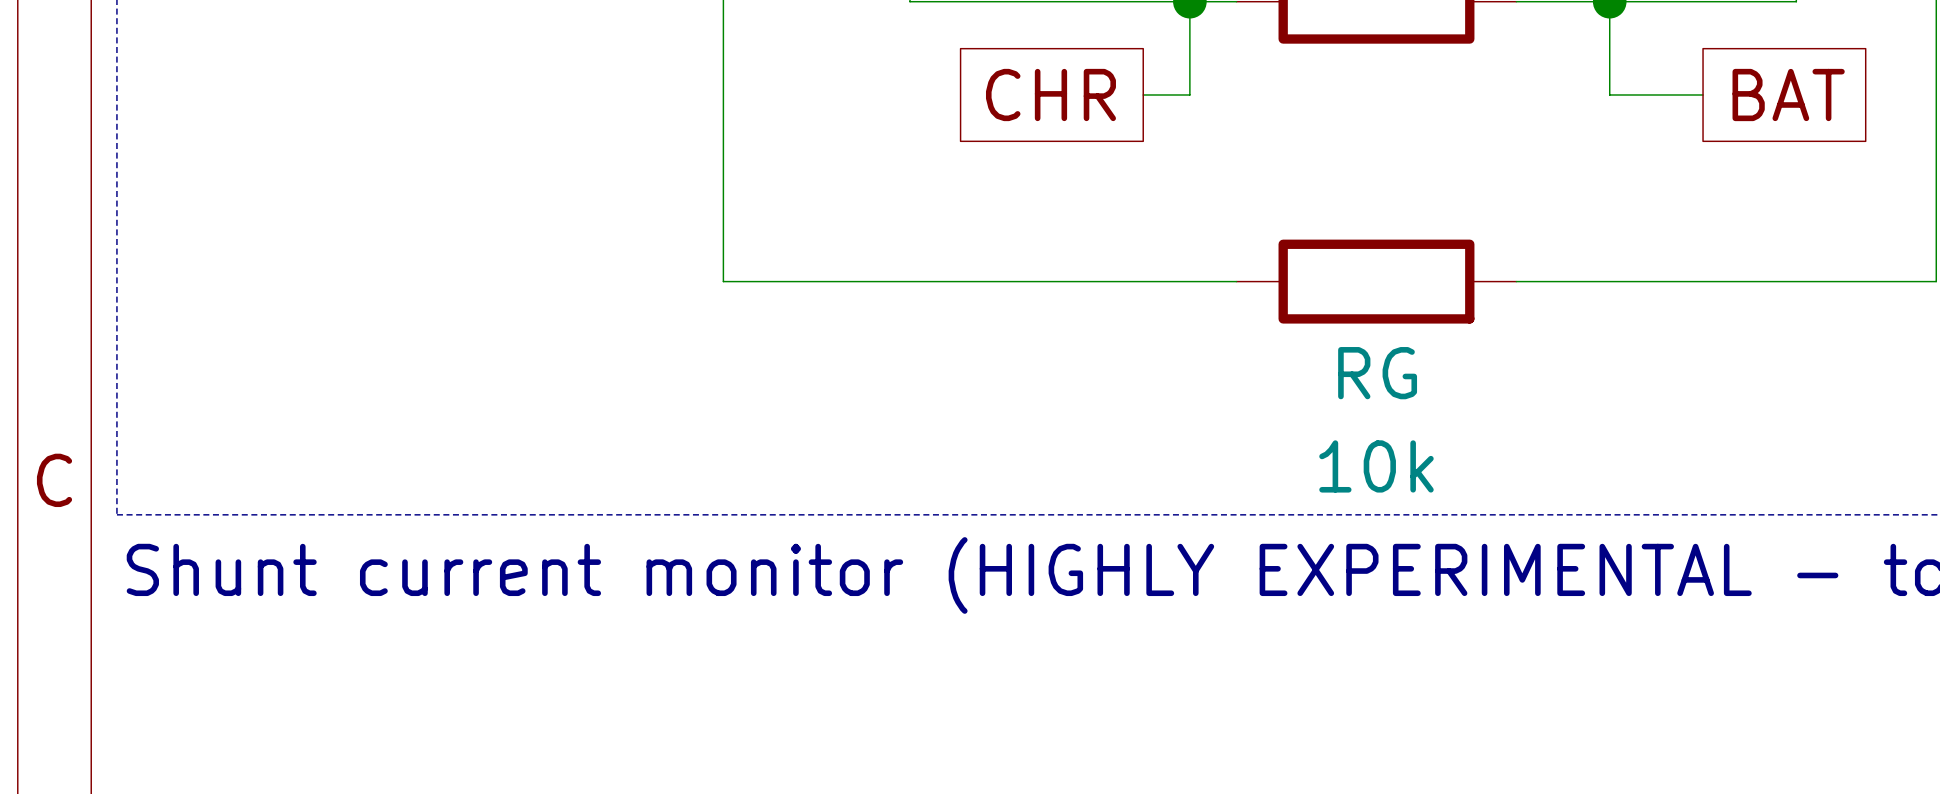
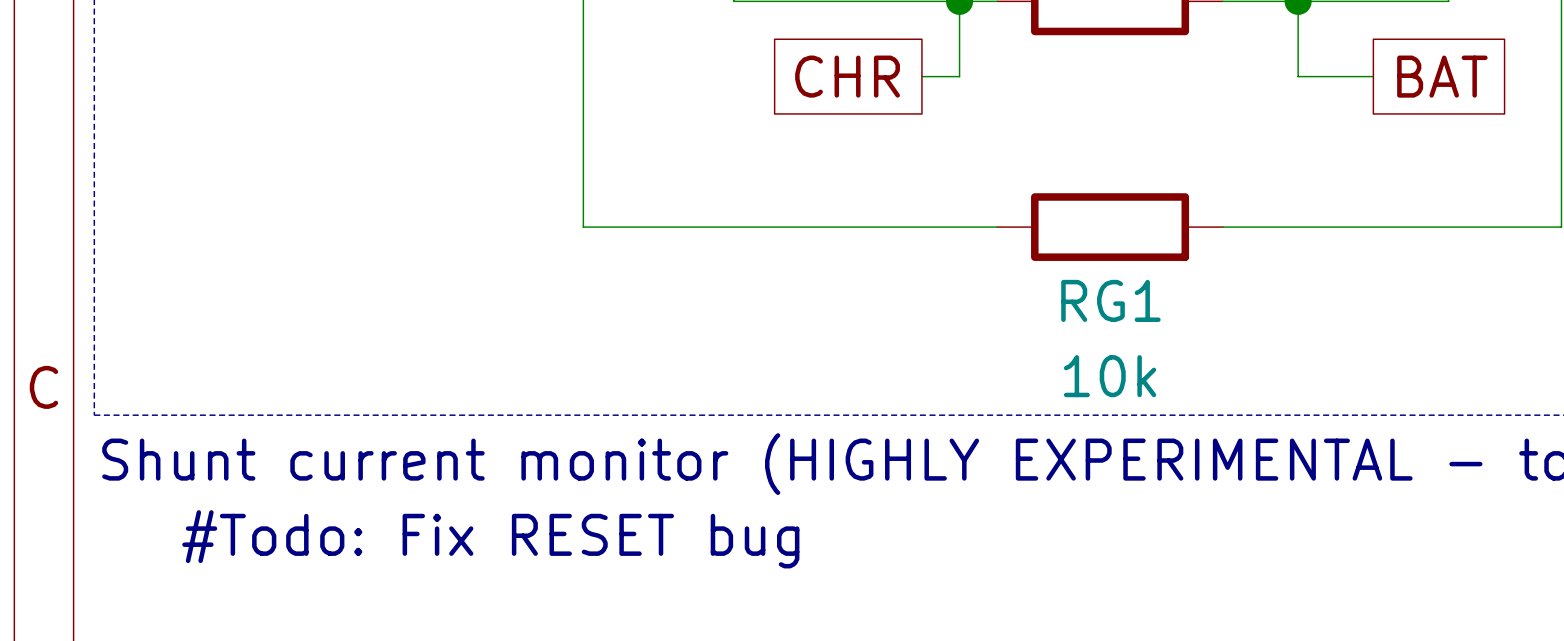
RG name: RG (1377, 373) -> RG1 (1110, 300)
text: none -> #Todo: Fix RESET bug (490, 539)

